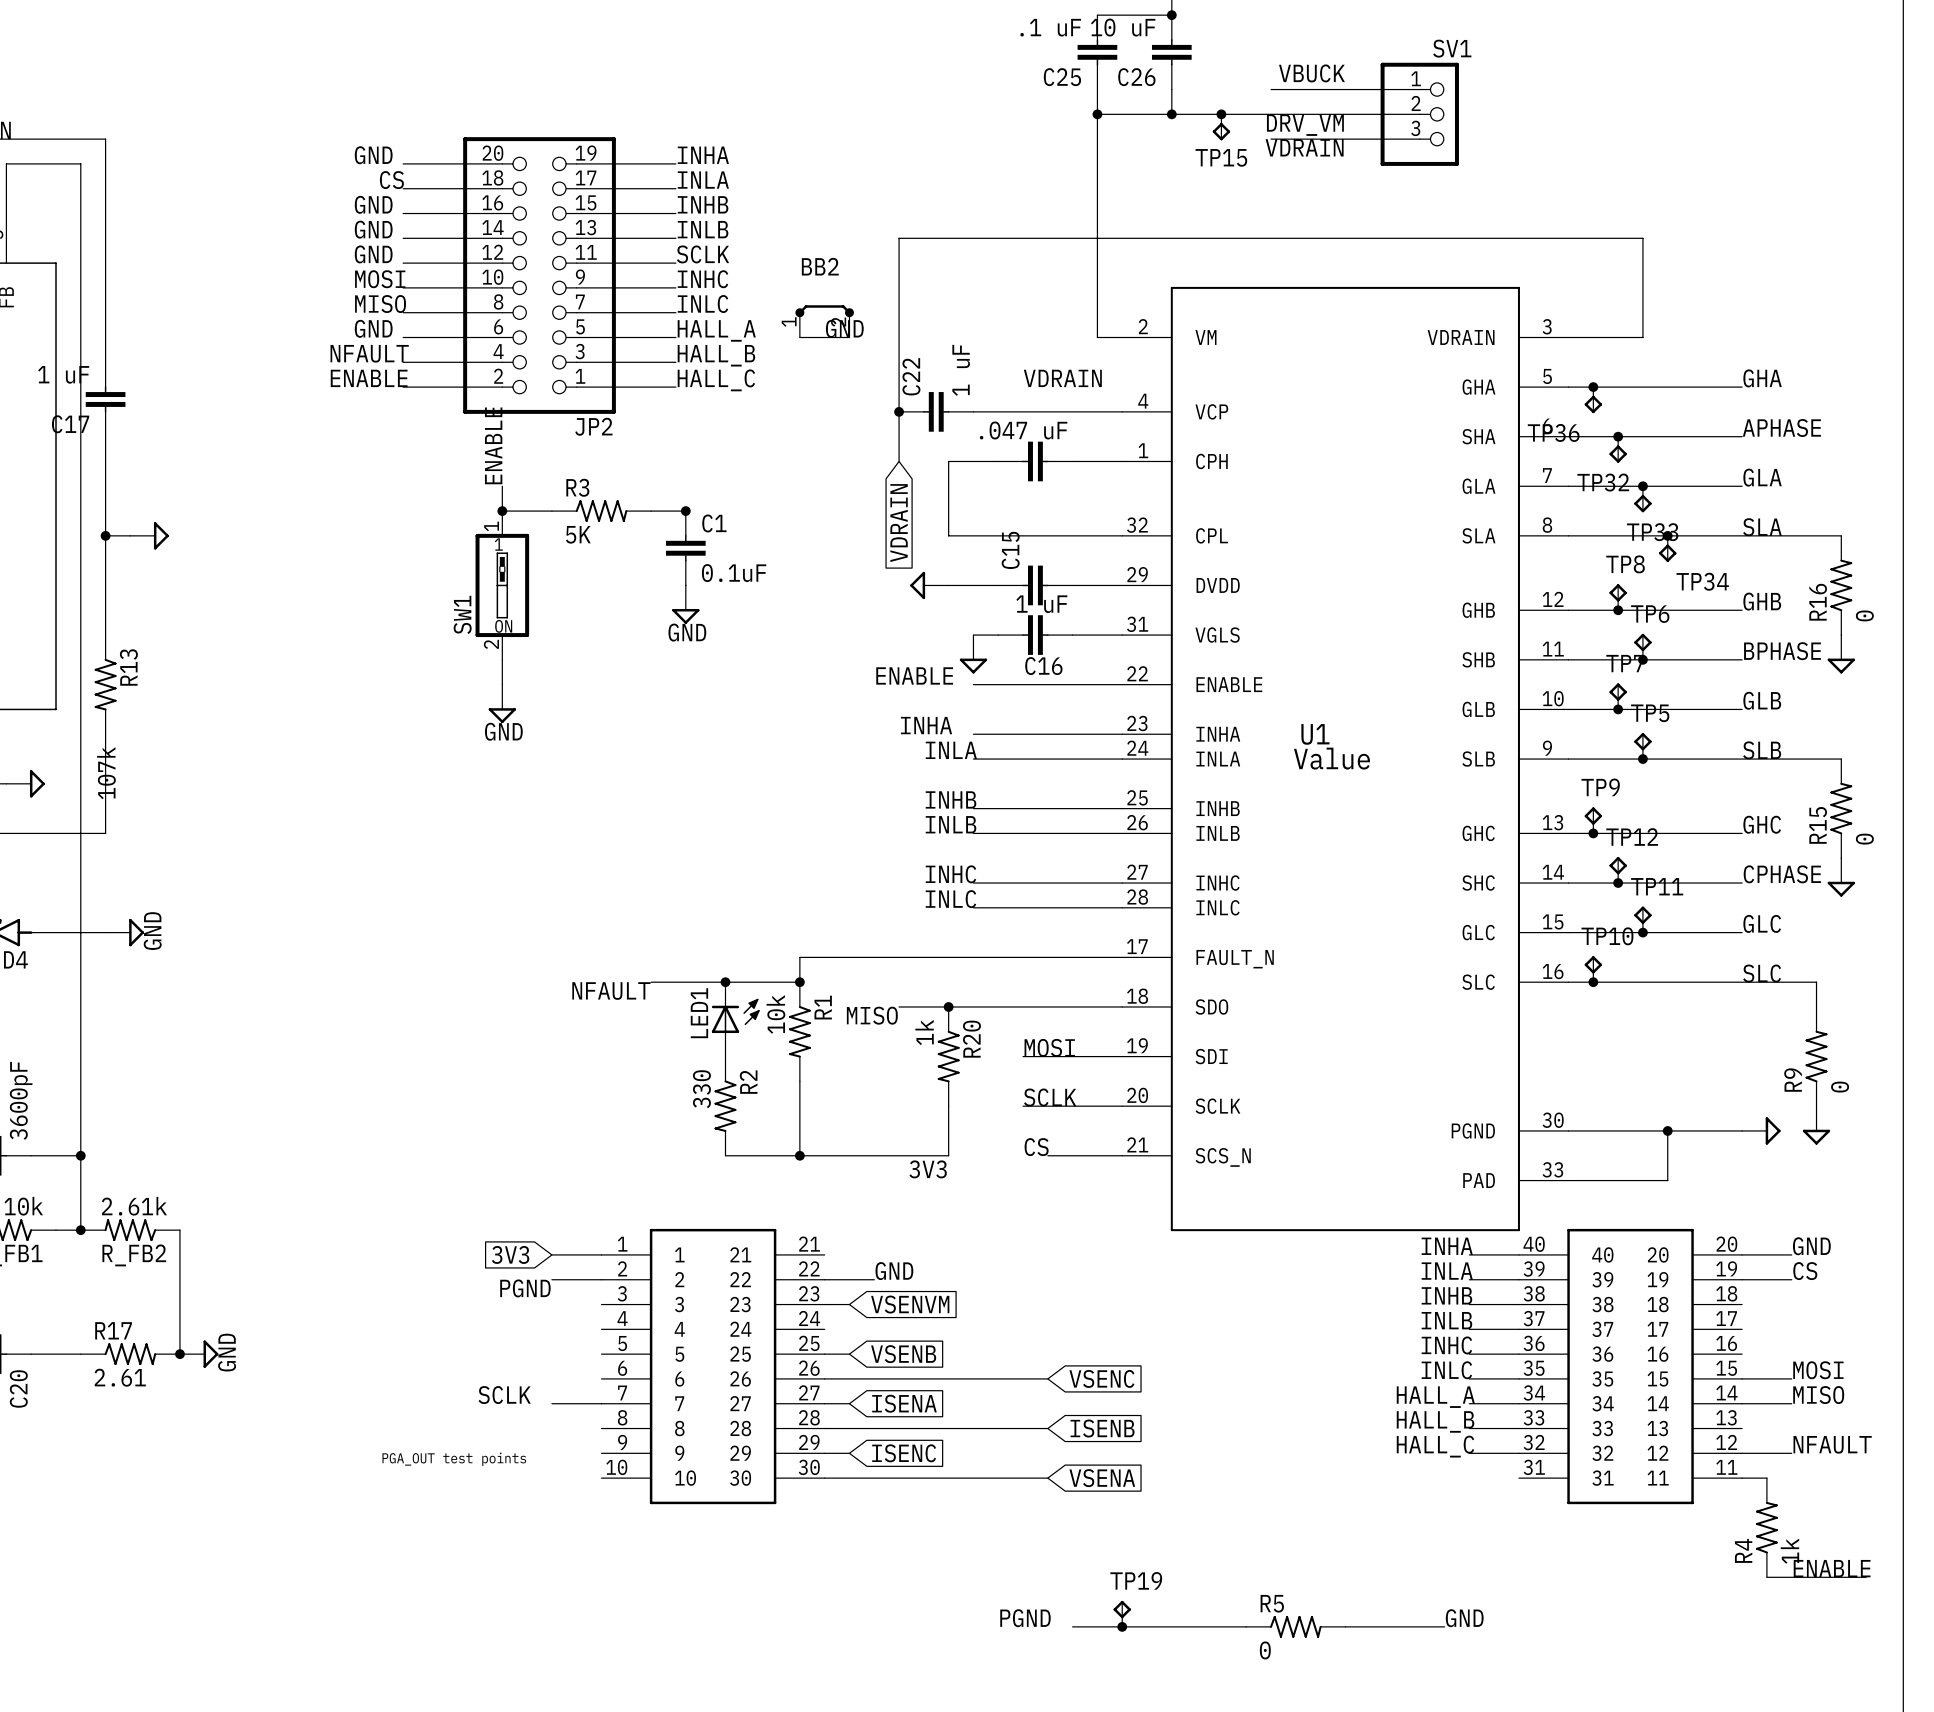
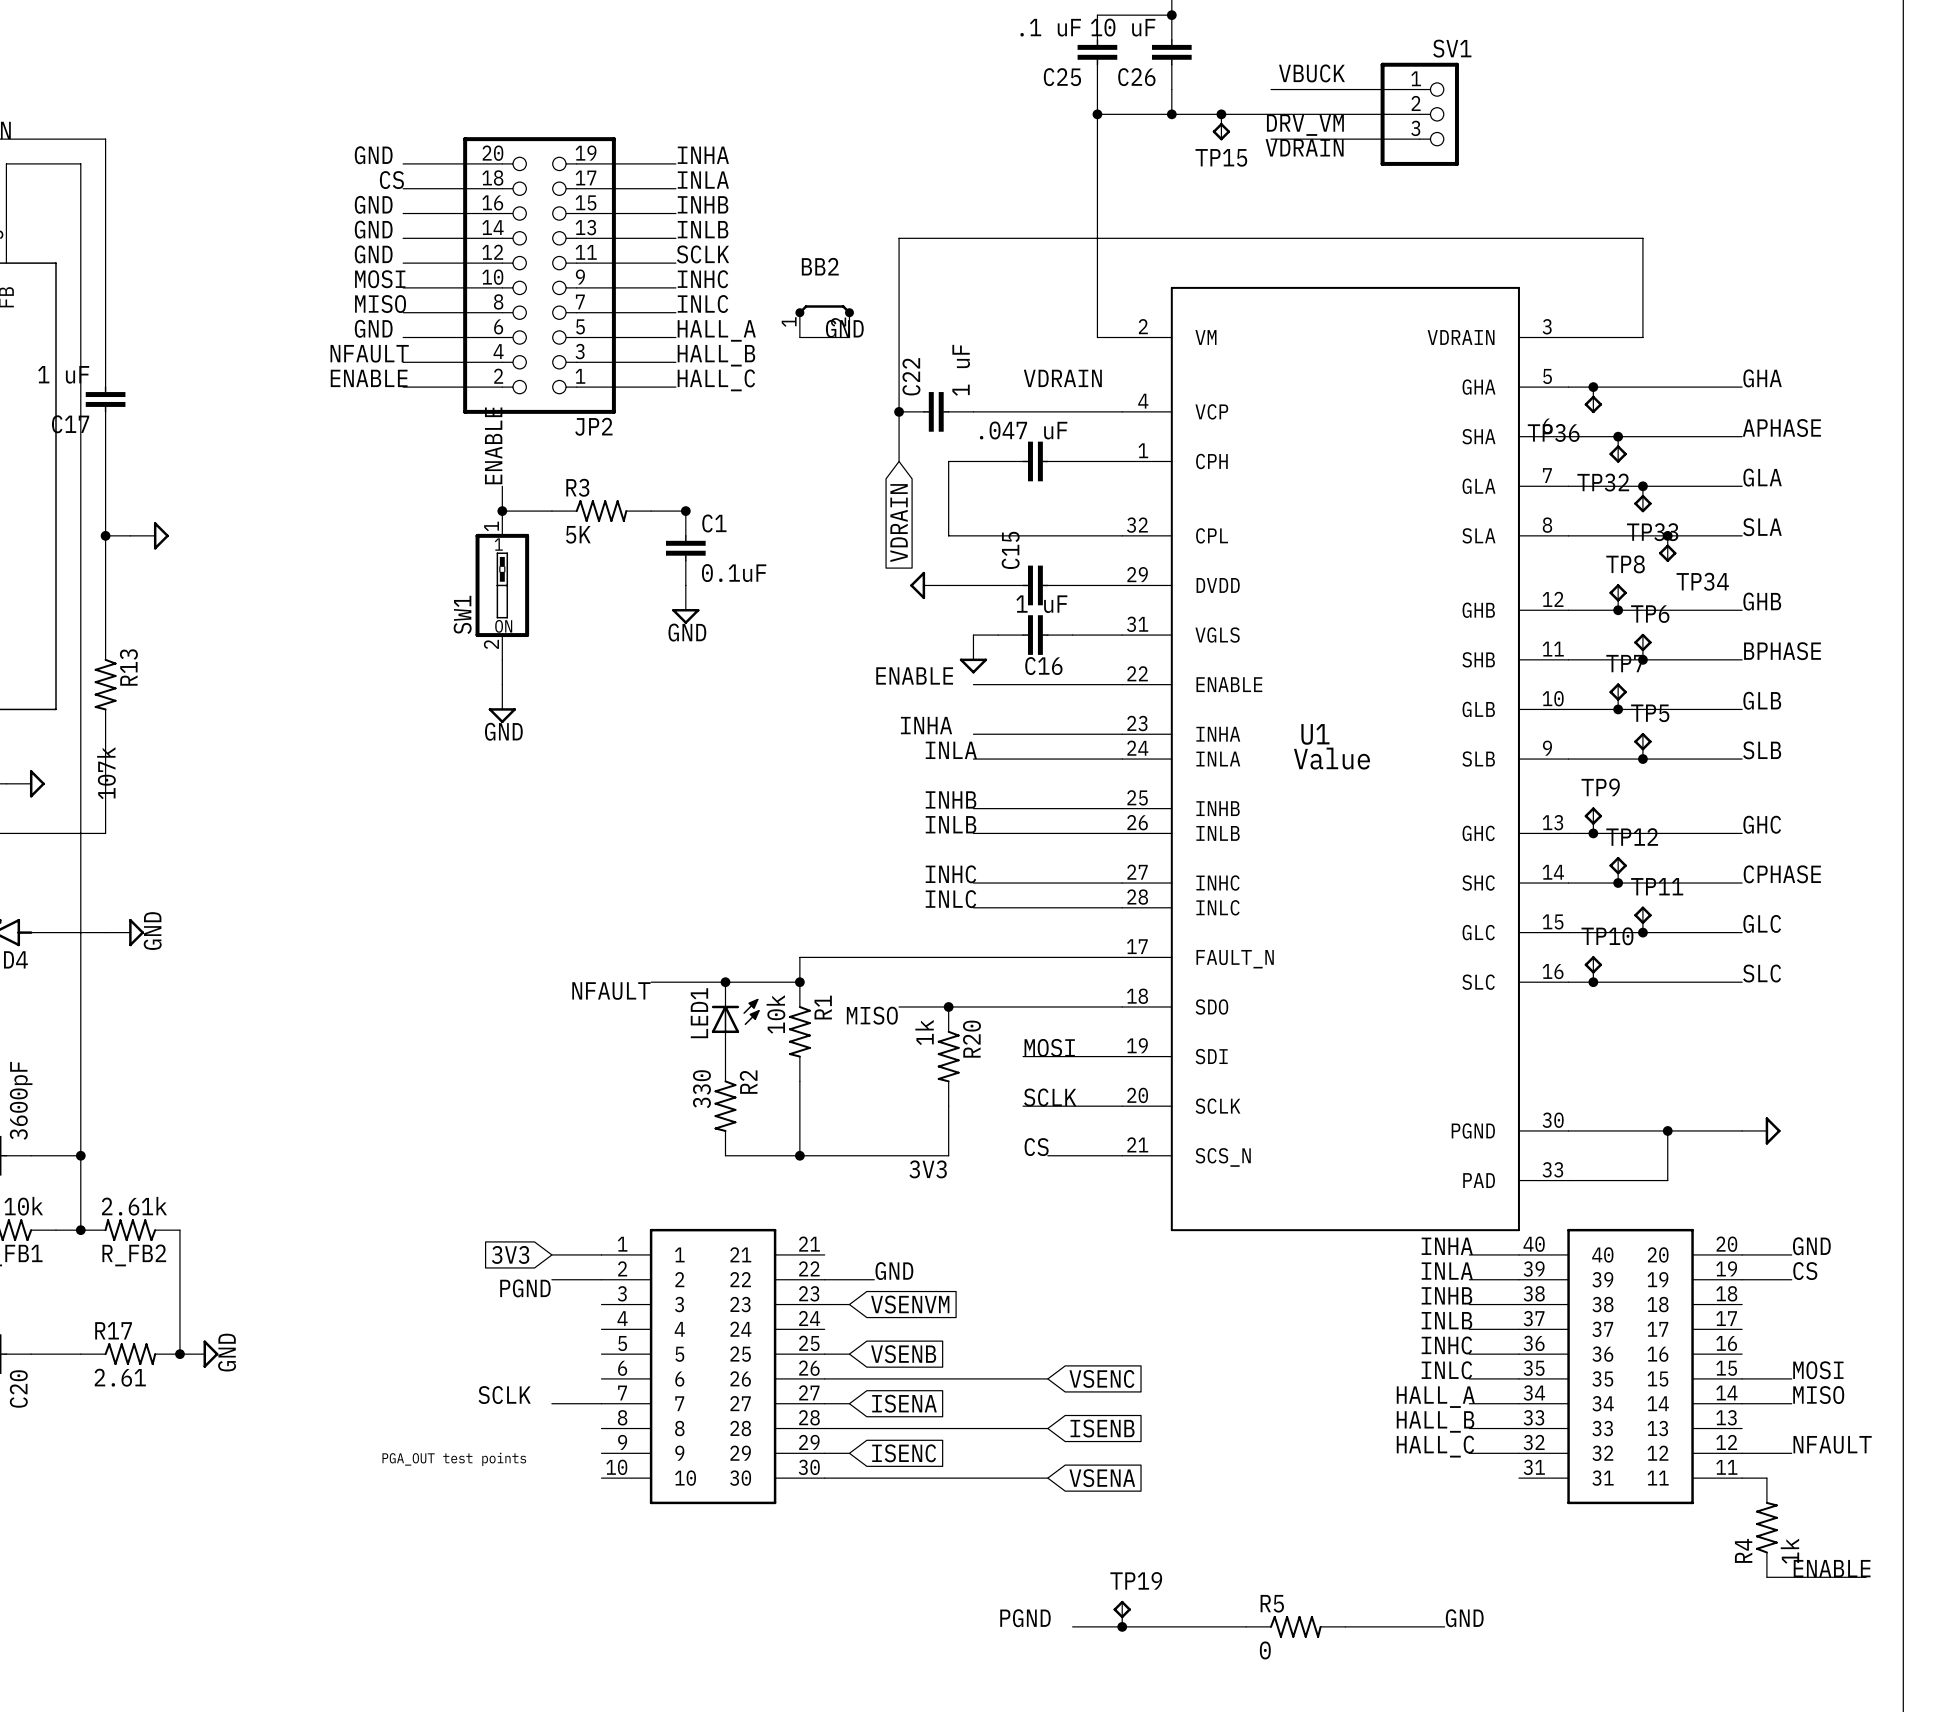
wire: (1742, 535) (1841, 535) -> none
R16: 0 (1841, 585) -> none
power symbol: (1841, 654) -> none
wire: (1742, 759) (1841, 759) -> none
R15: 0 (1841, 808) -> none
power symbol: (1841, 877) -> none
wire: (1742, 982) (1816, 982) (1816, 1006) -> none
R9: 0 (1816, 1056) -> none
power symbol: (1816, 1125) -> none

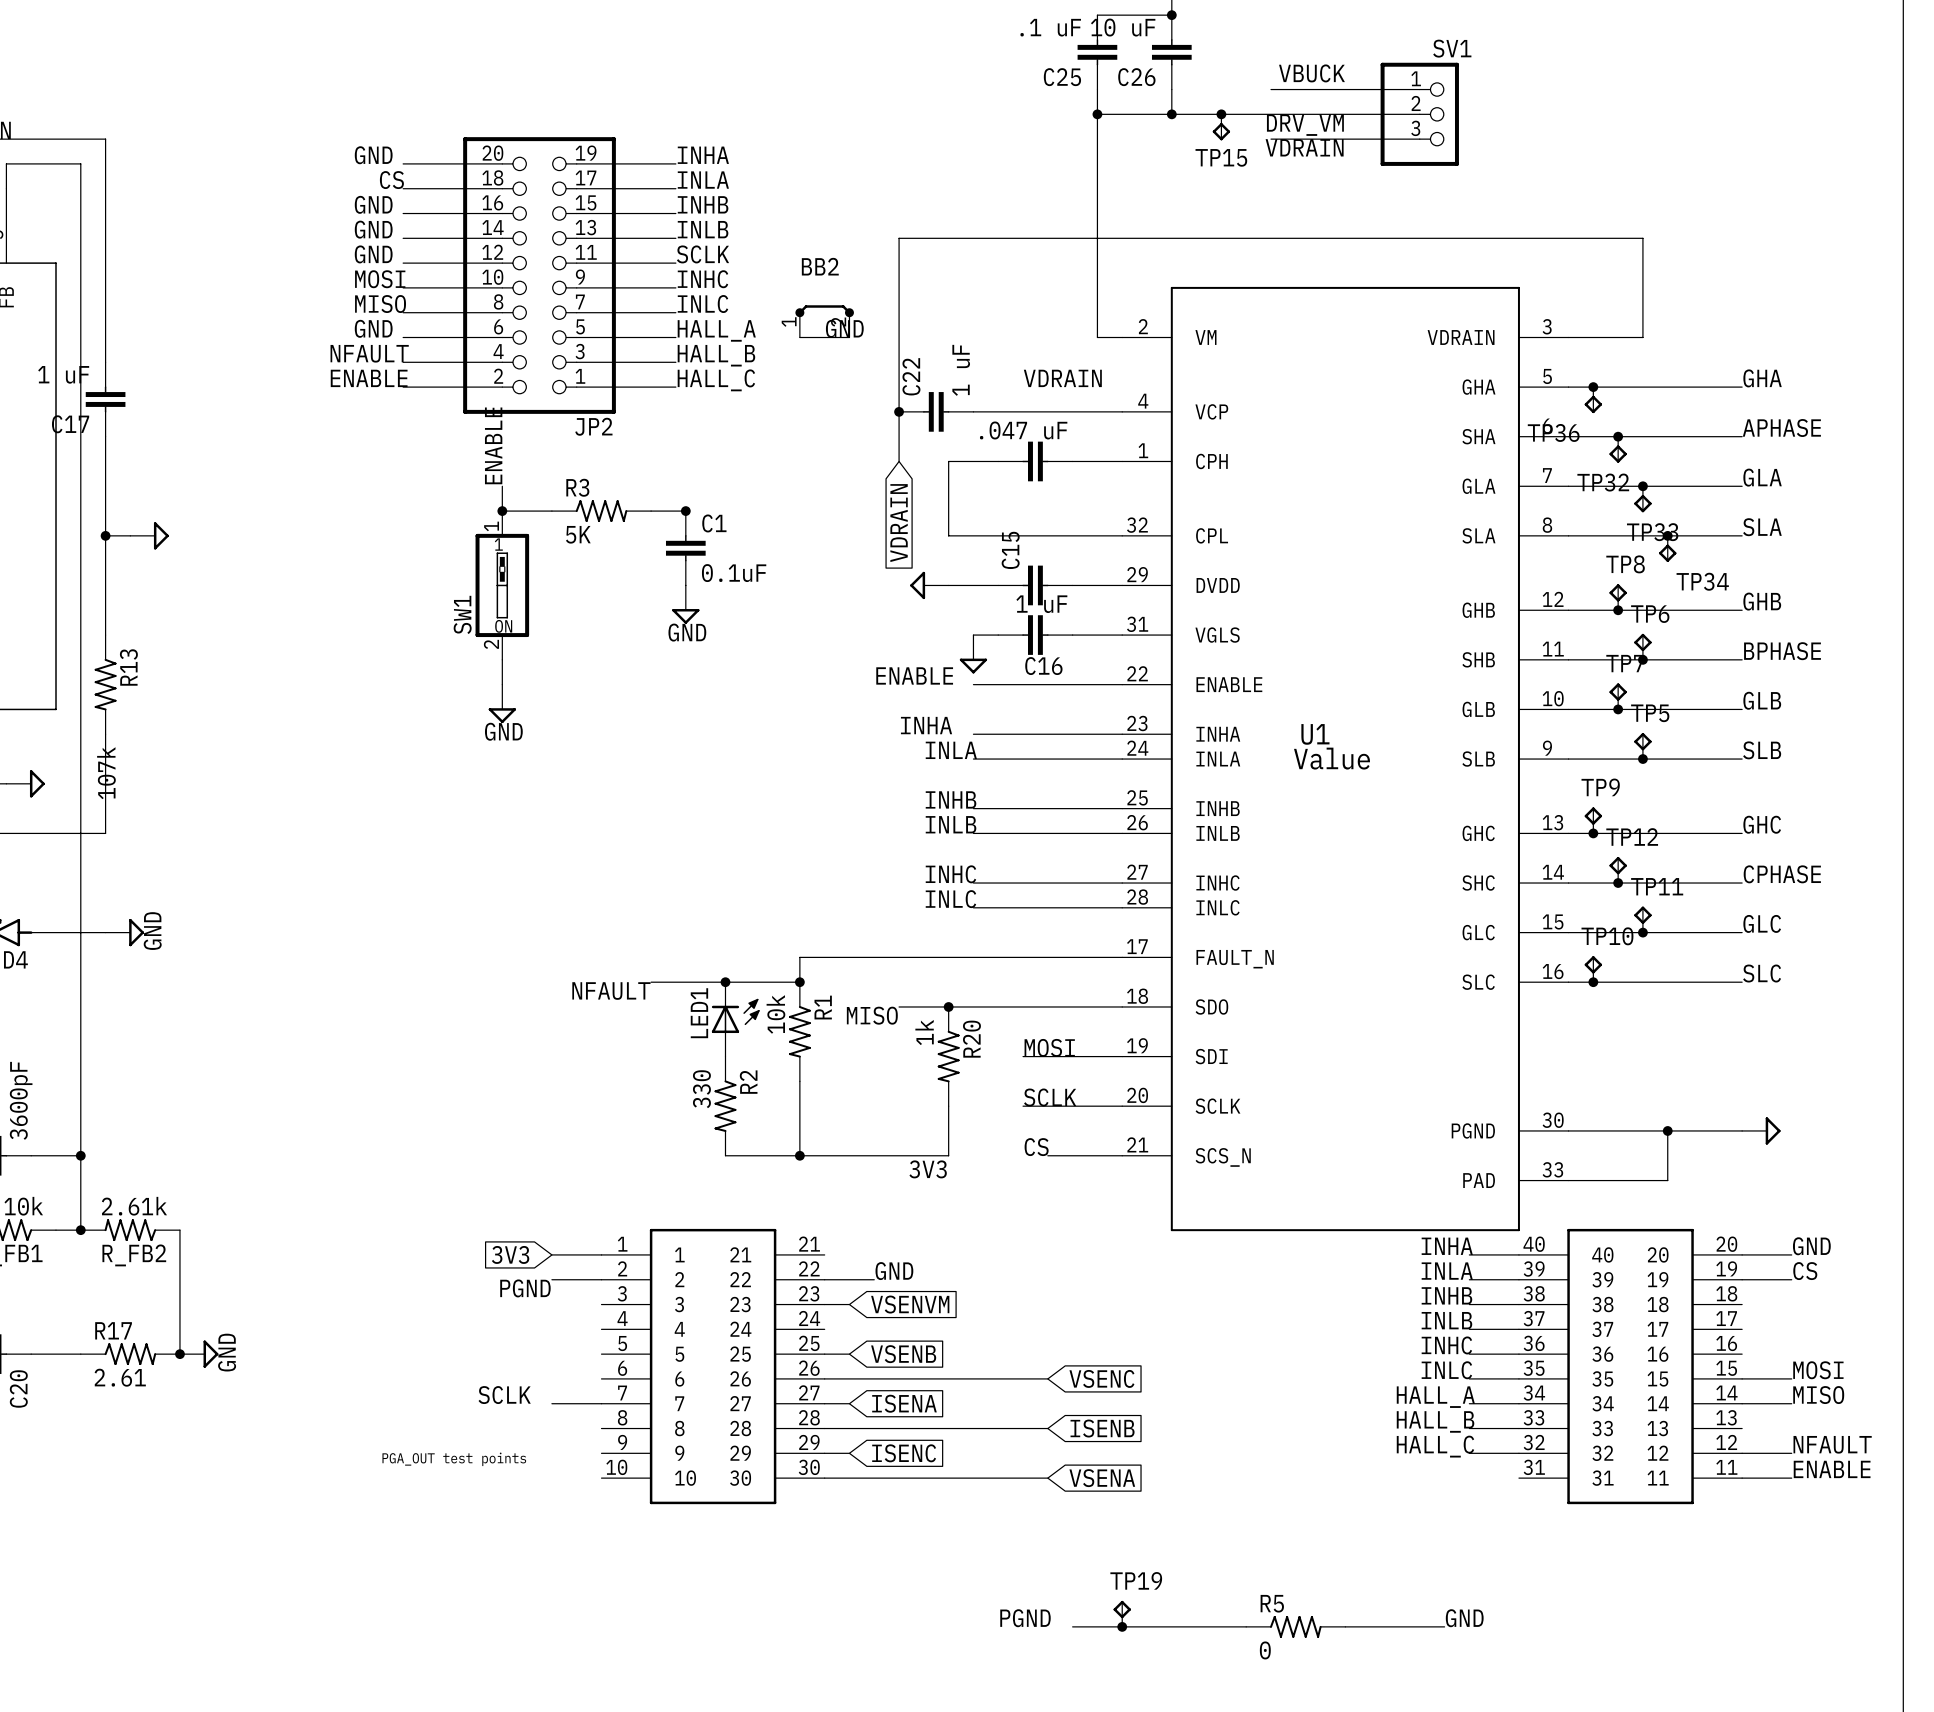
wire: none -> (1766, 1478) (1791, 1478)
R4: 1k (1766, 1527) -> none
label position: ENABLE (1832, 1568) -> ENABLE (1832, 1469)
wire: (1766, 1577) (1866, 1577) -> none

